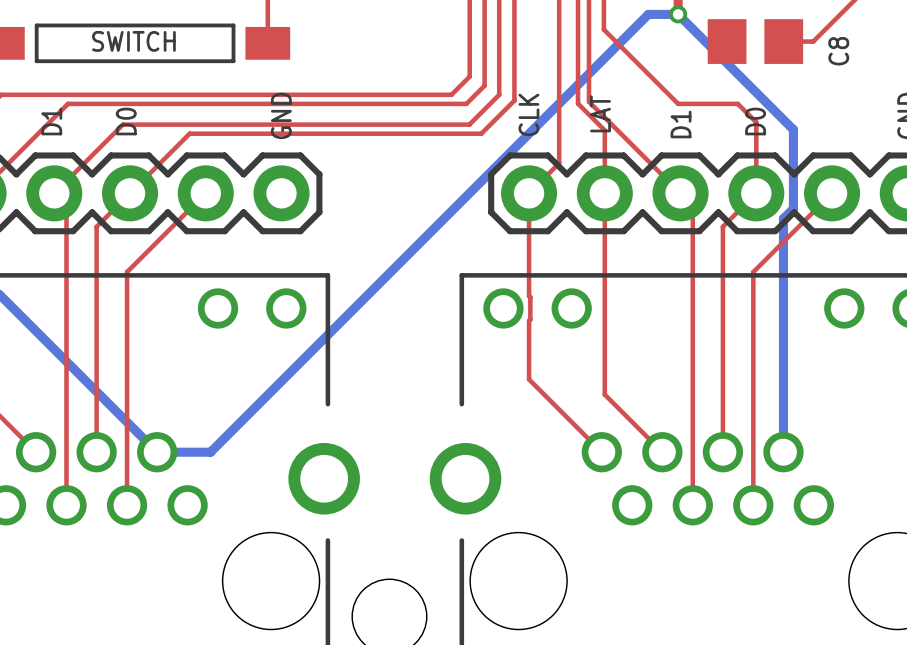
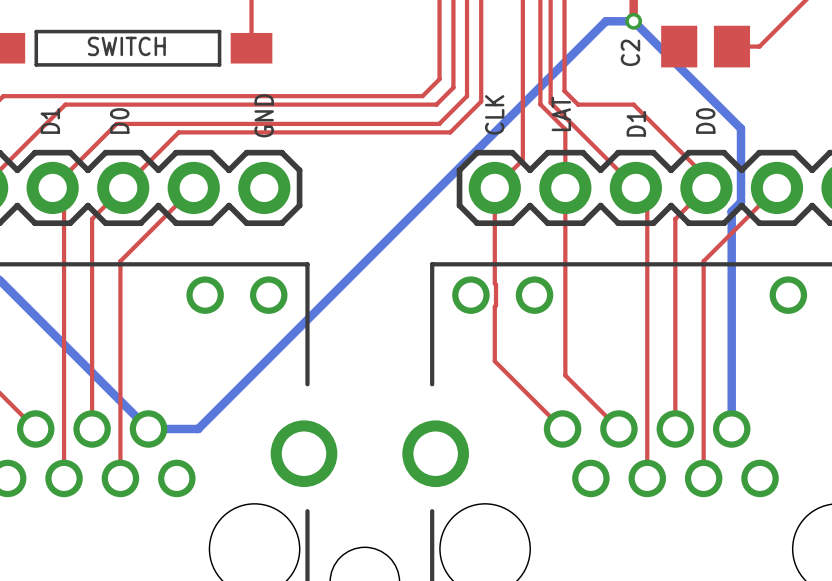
top track: (603, 29) (678, 103) (737, 103) (756, 122) (756, 182) -> (564, 35) (564, 91) (578, 104) (633, 104) (706, 177)
C8 name: C8 (838, 51) -> C2 (630, 52)

